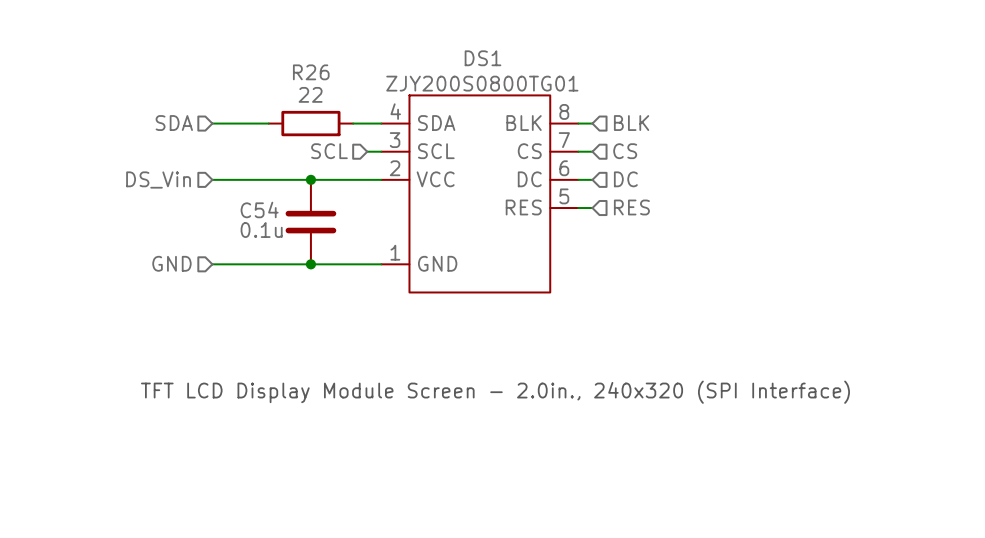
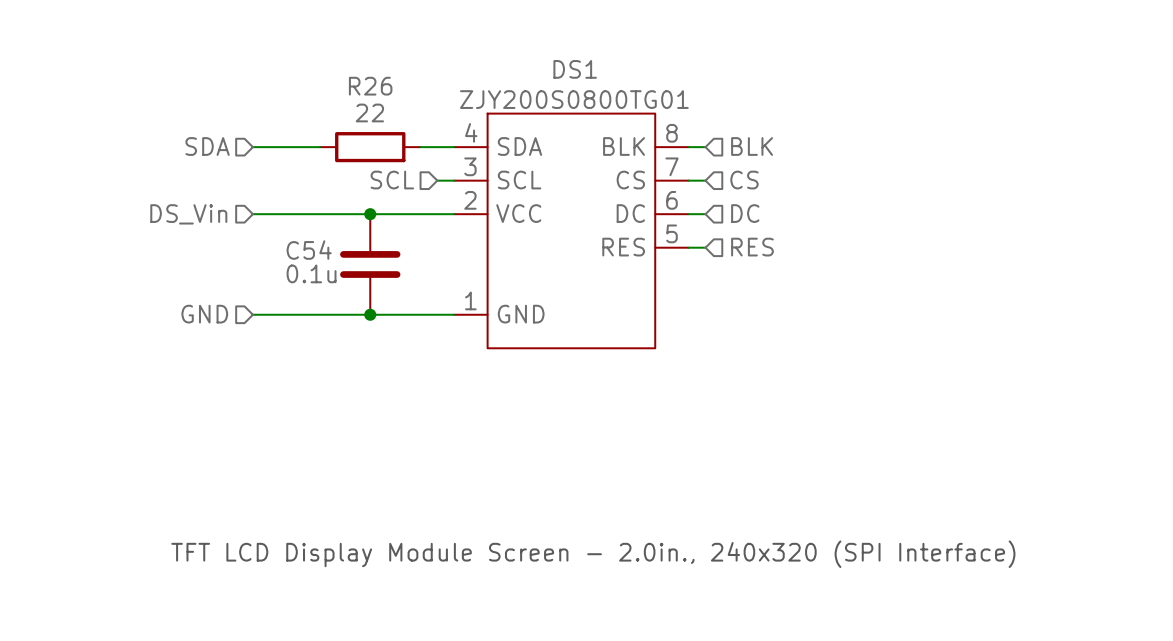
text position: TFT LCD Display Module Screen - 2.0in., 240x320 (SPI Interface) (495, 392) -> TFT LCD Display Module Screen - 2.0in., 240x320 (SPI Interface) (593, 554)

